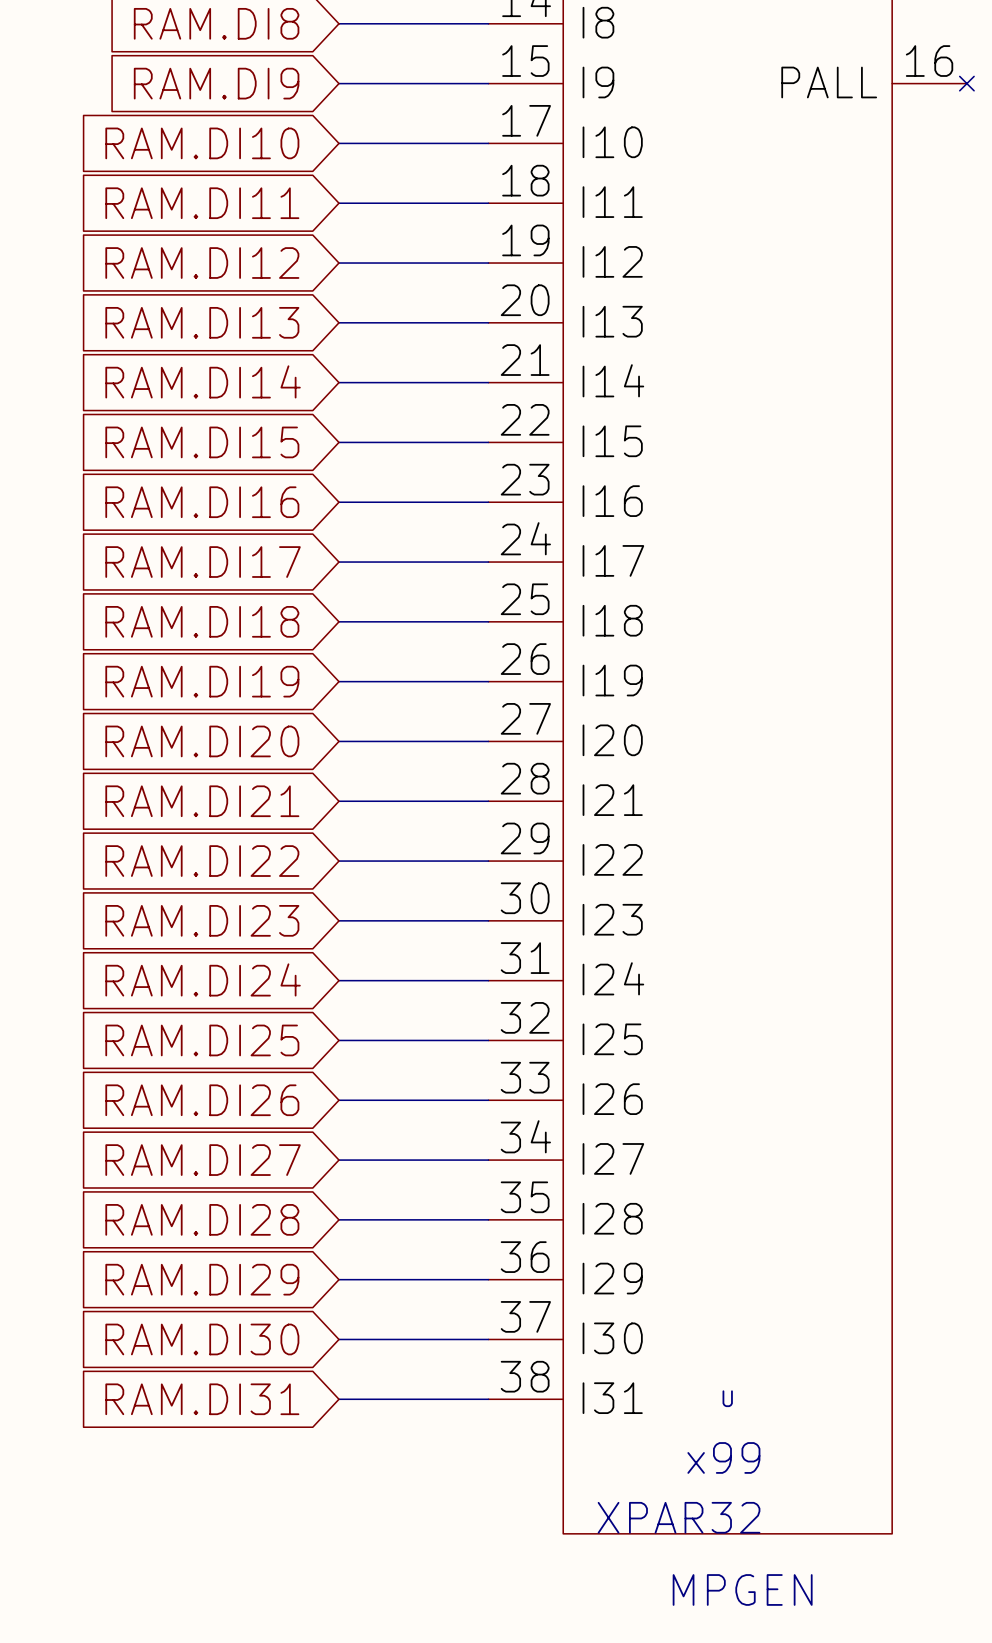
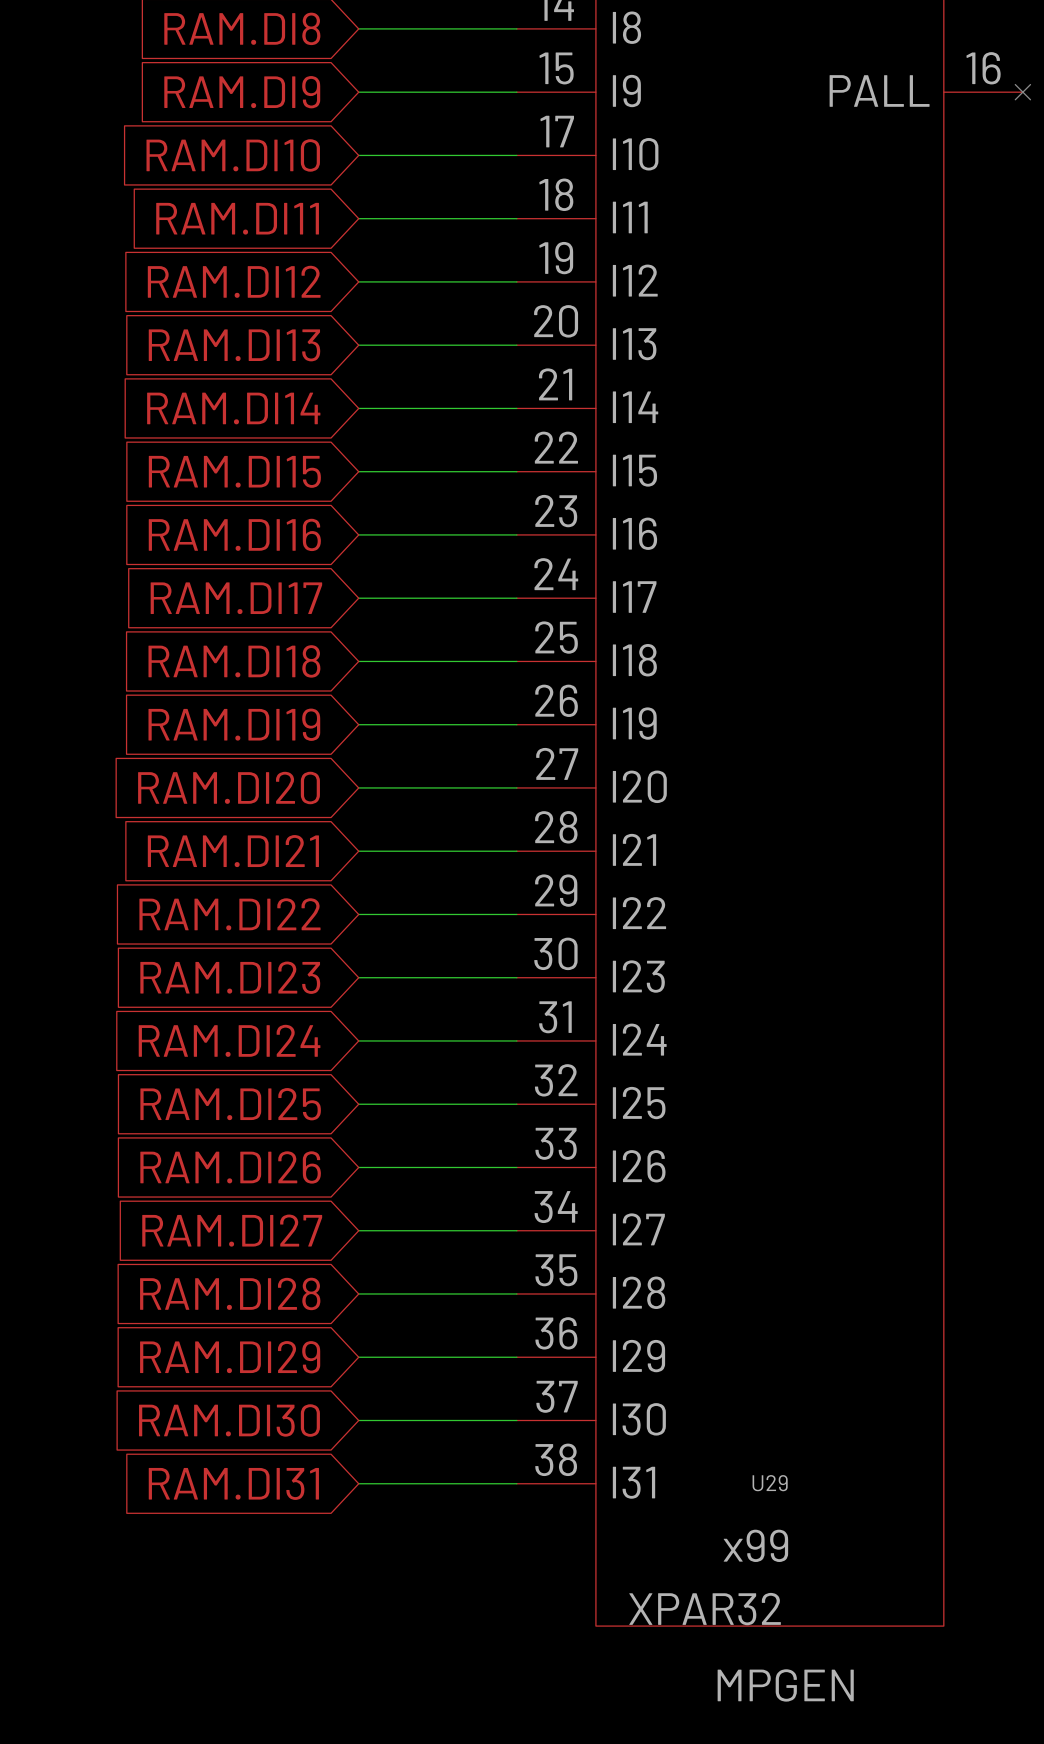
U name: U (727, 1398) -> U29 (770, 1483)

